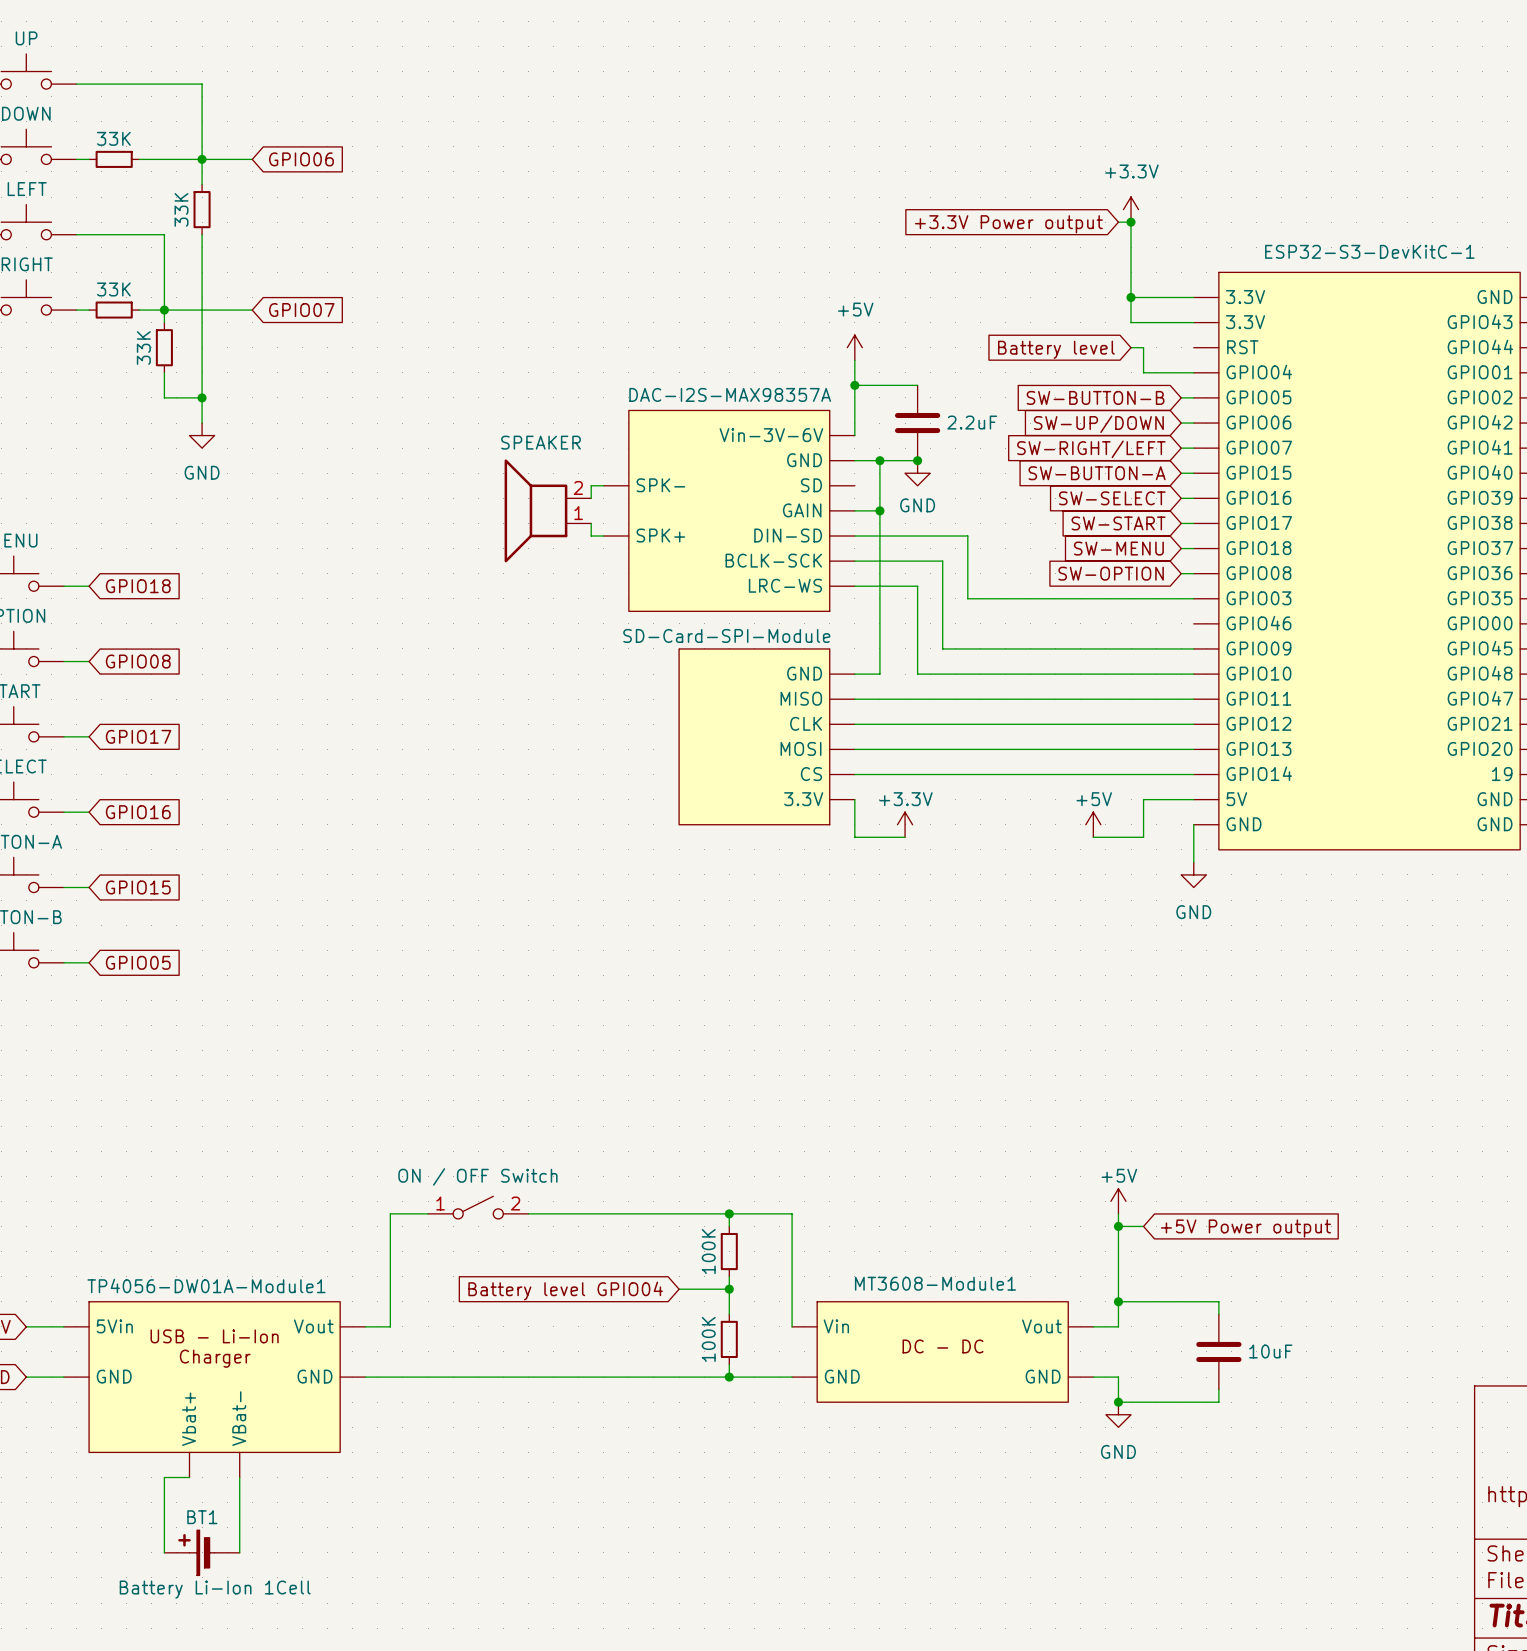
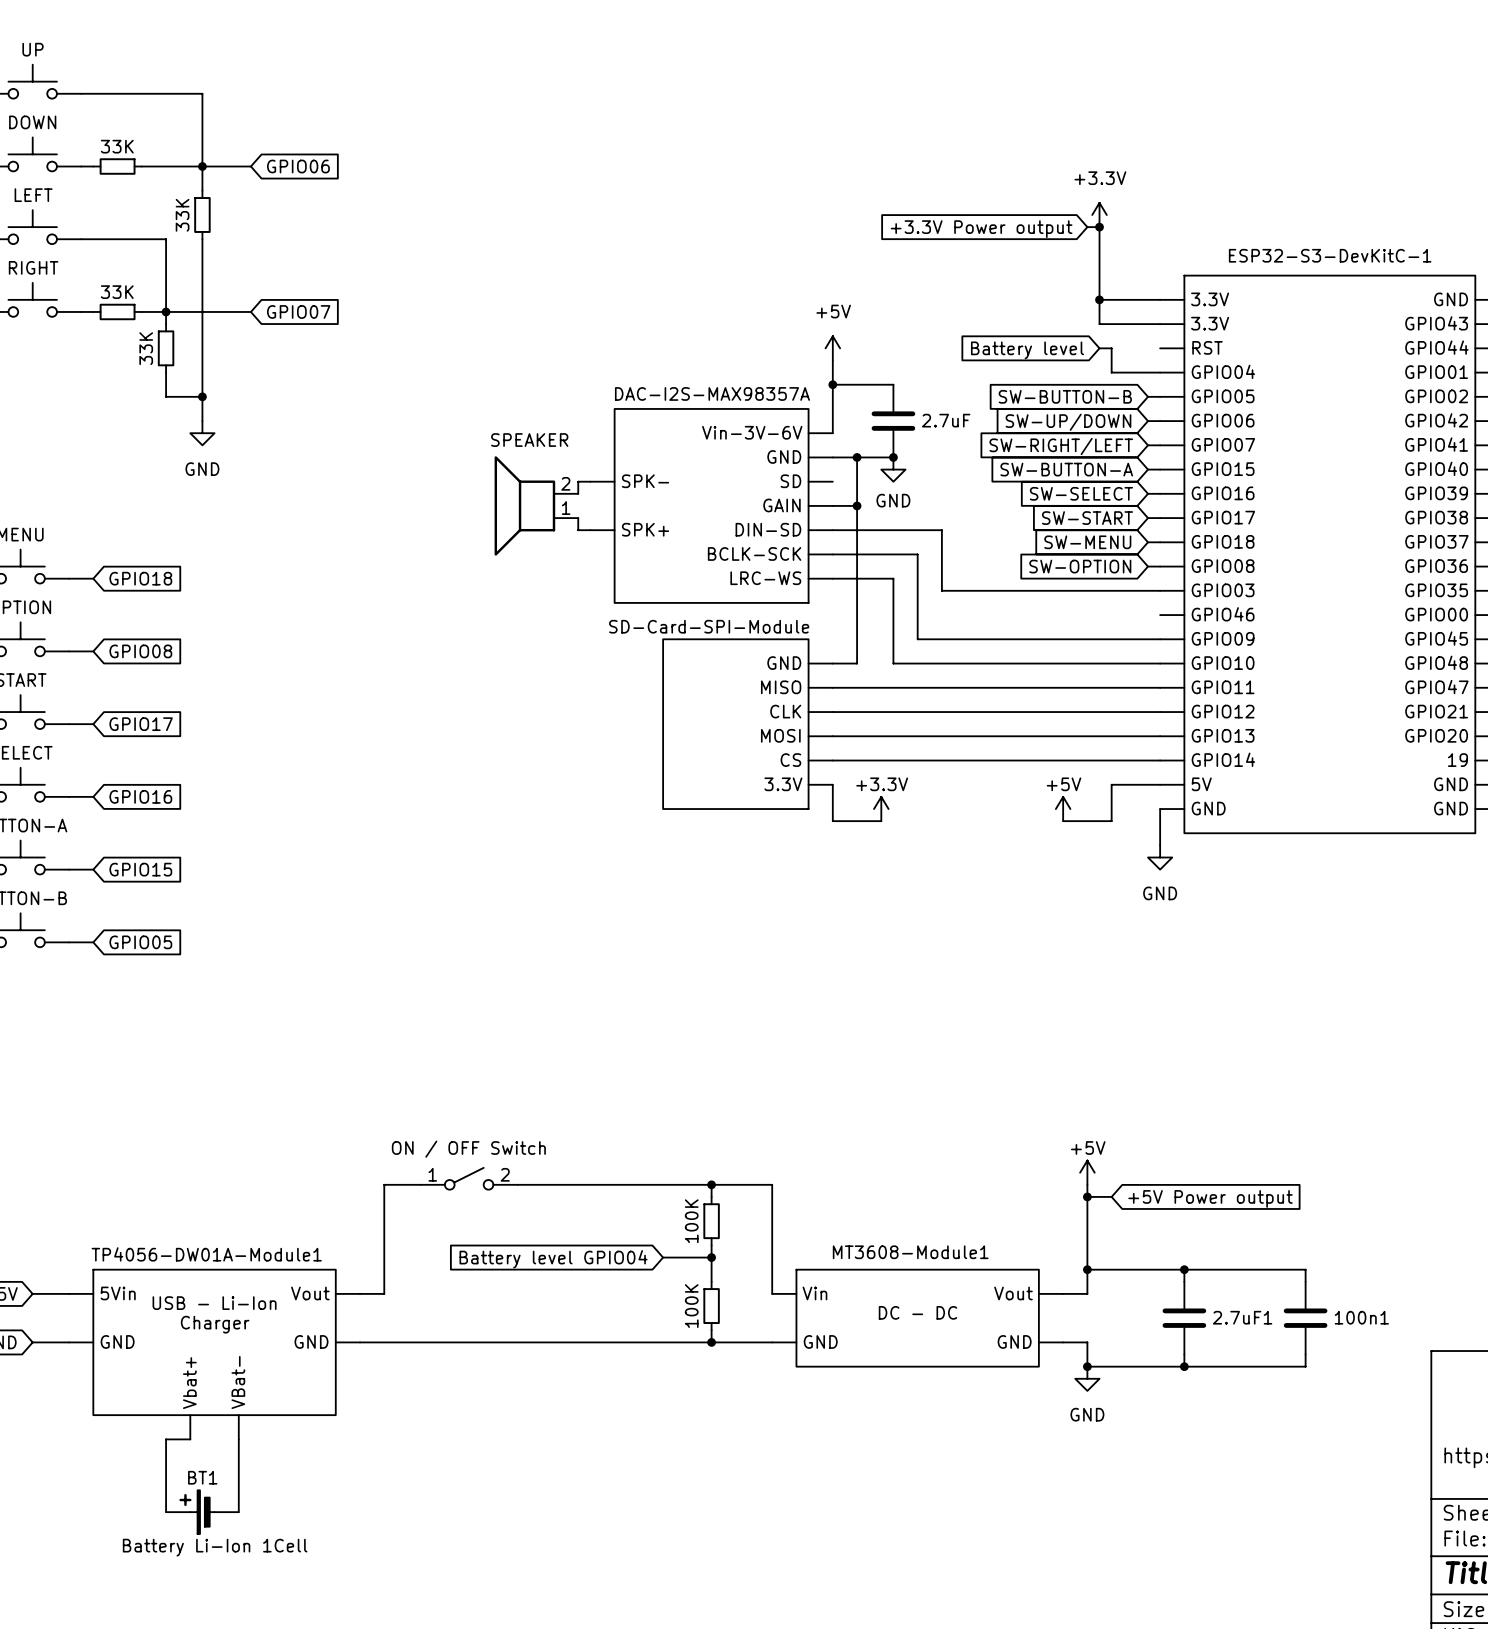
2.2uF name: 2.2uF (972, 422) -> 2.7uF (946, 420)
wire: none -> (1184, 1269) (1305, 1269) (1305, 1281)
junction: none -> (1184, 1269)
10uF name: 10uF (1270, 1351) -> 2.7uF1 (1242, 1317)
100n1: none -> (1305, 1318)
wire: none -> (1305, 1354) (1305, 1366) (1184, 1366)
junction: none -> (1184, 1366)

